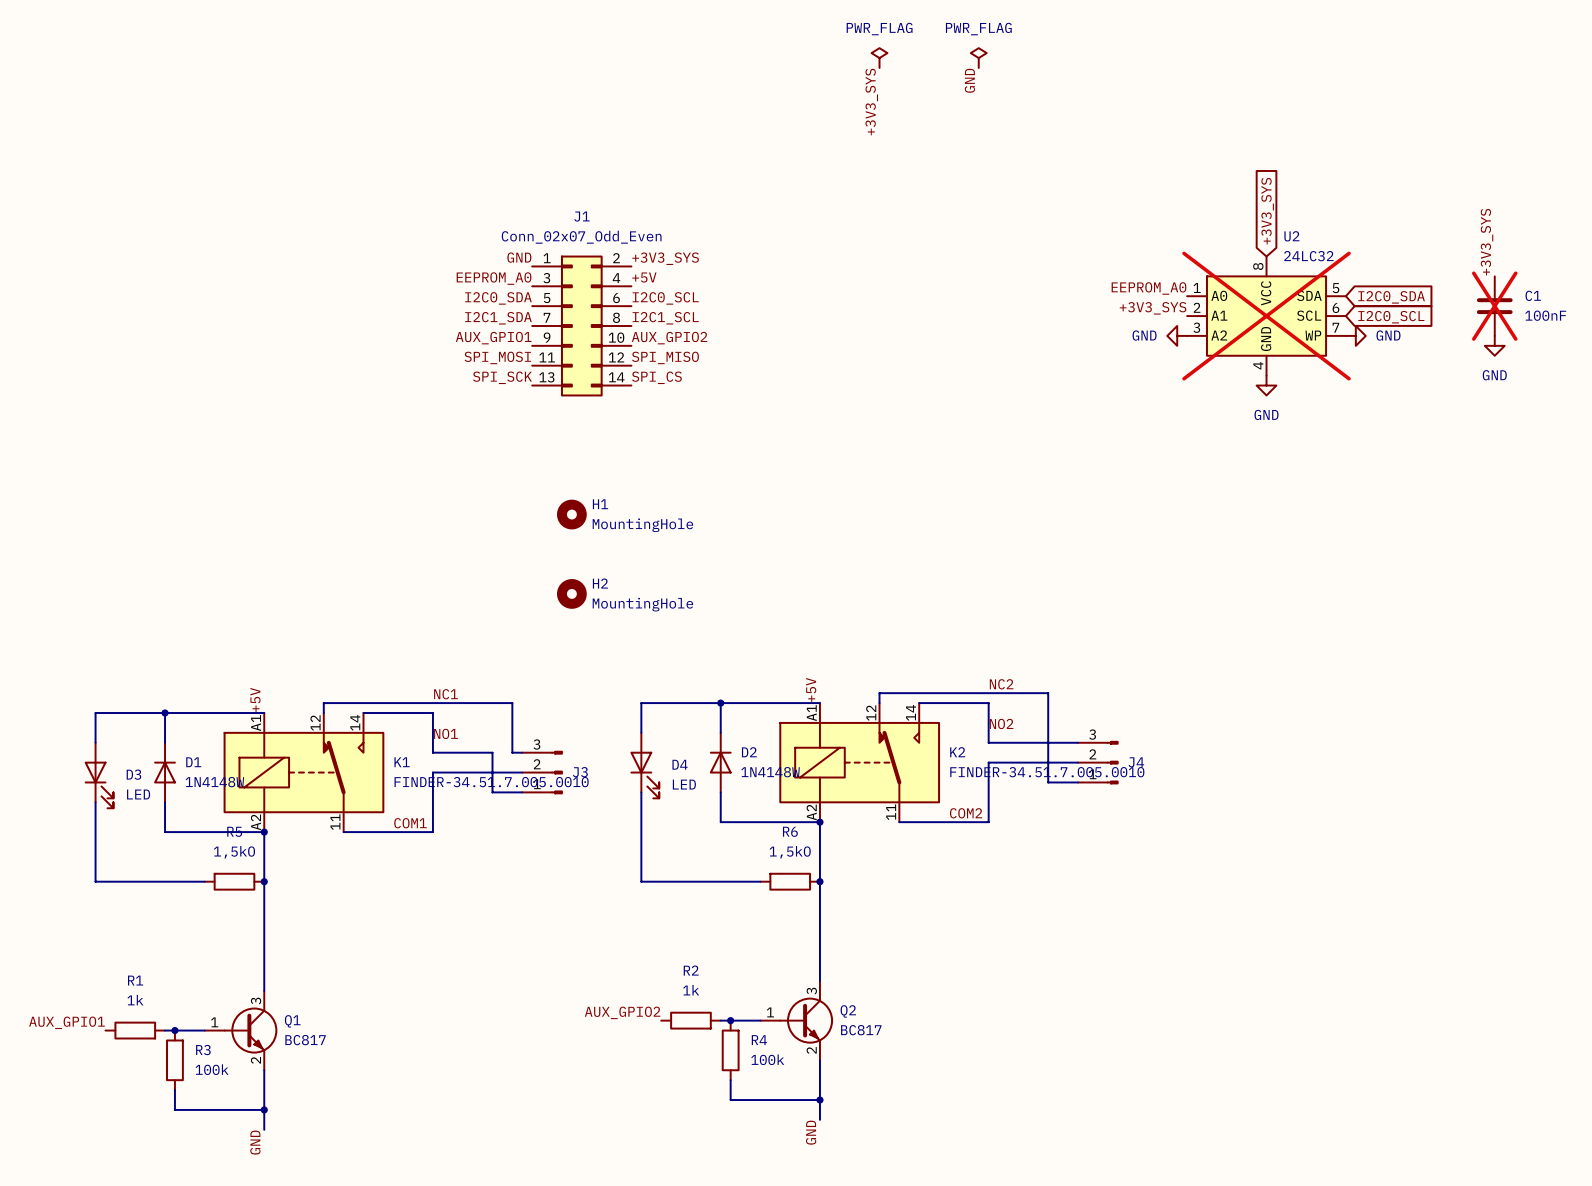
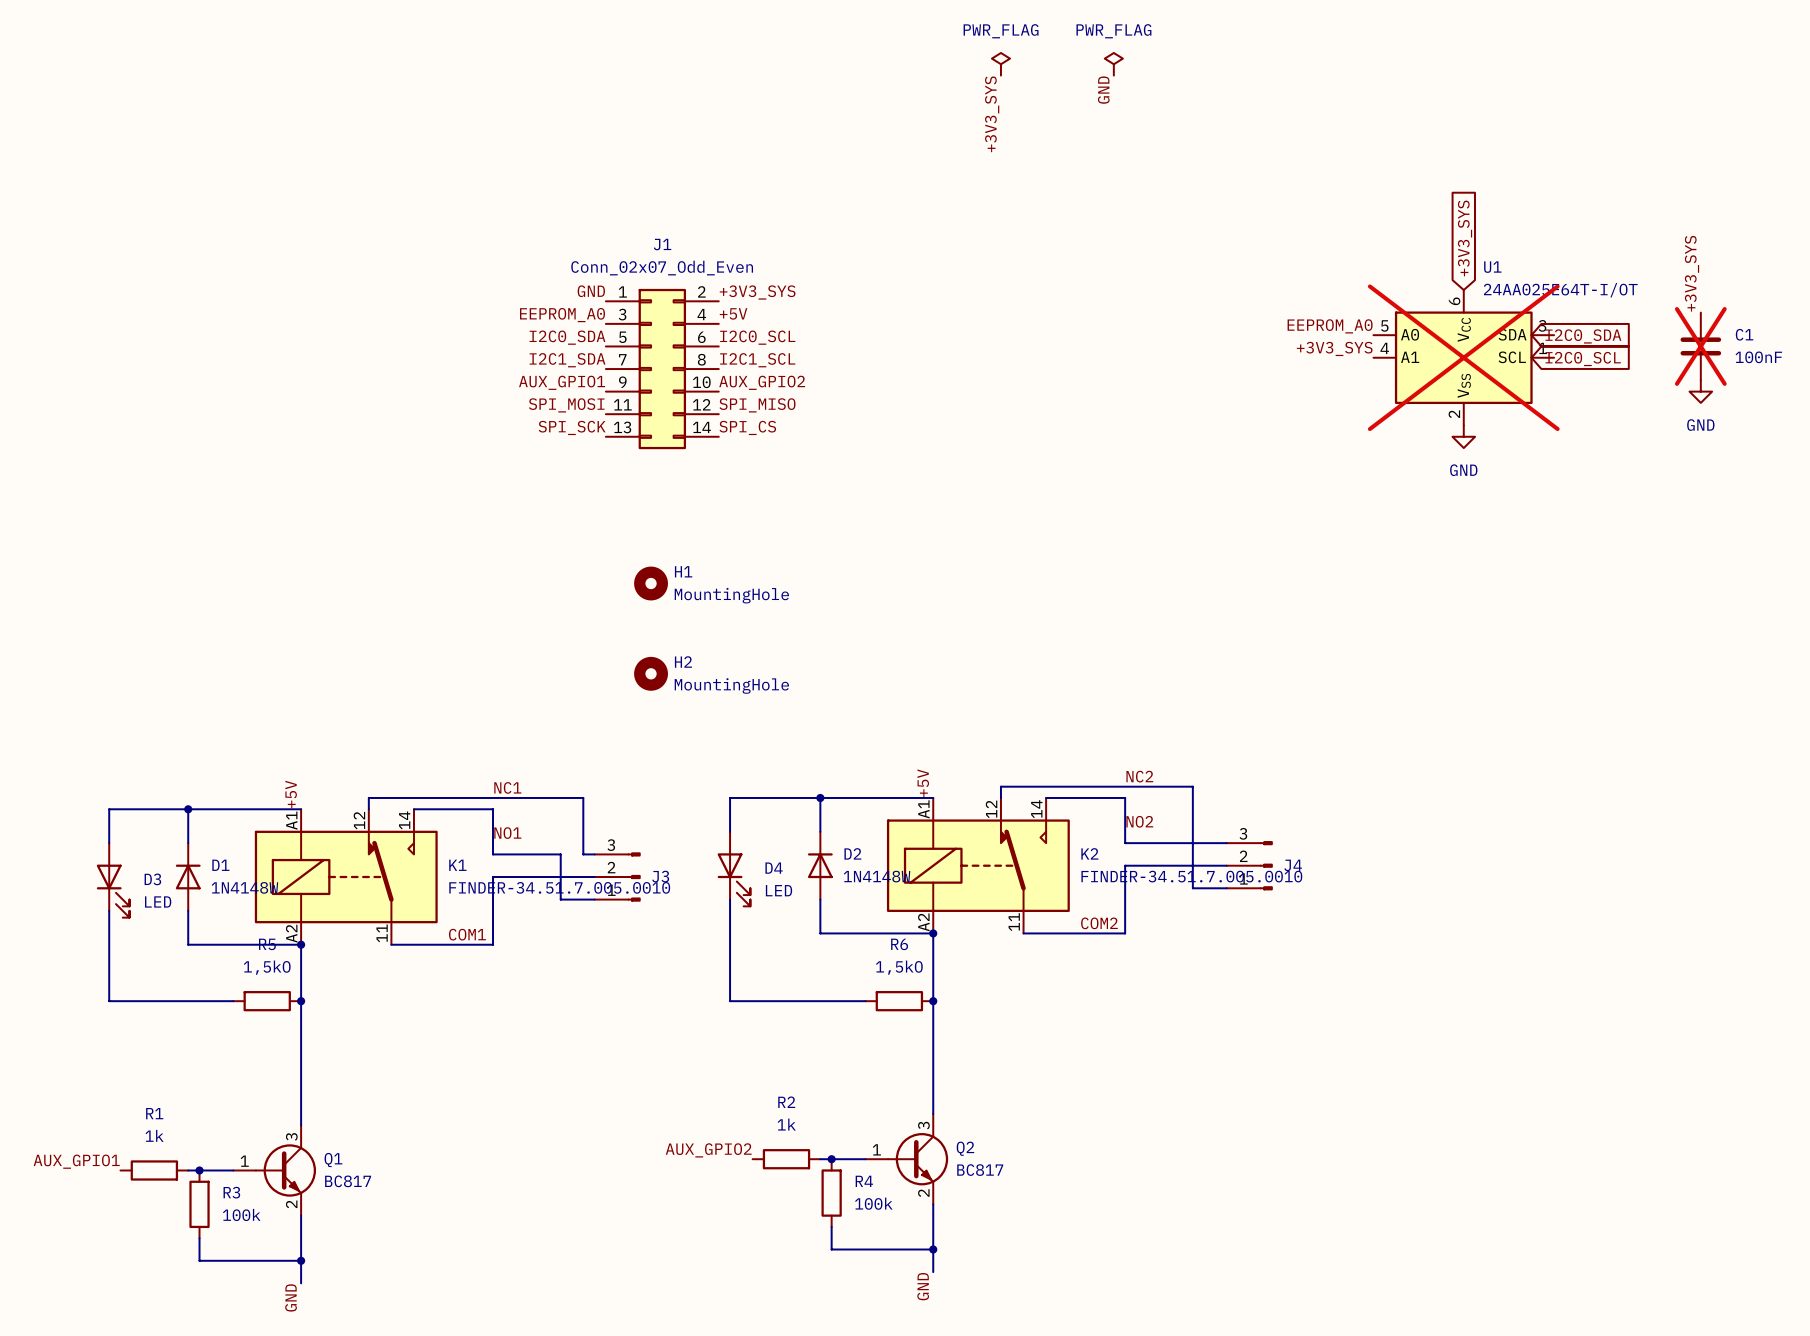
global label position: +3V3_SYS (1267, 211) -> +3V3_SYS (1465, 238)
label position: EEPROM_A0 (1148, 288) -> EEPROM_A0 (1330, 326)
label position: +3V3_SYS (1153, 308) -> +3V3_SYS (1334, 348)
U2: 24LC32 (1266, 316) -> none
U1: none -> 24AA025E64T-I/OT (1463, 357)
power symbol: GND (1177, 335) -> none
power symbol: GND (1355, 335) -> none
power symbol position: GND (1266, 385) -> GND (1463, 436)

